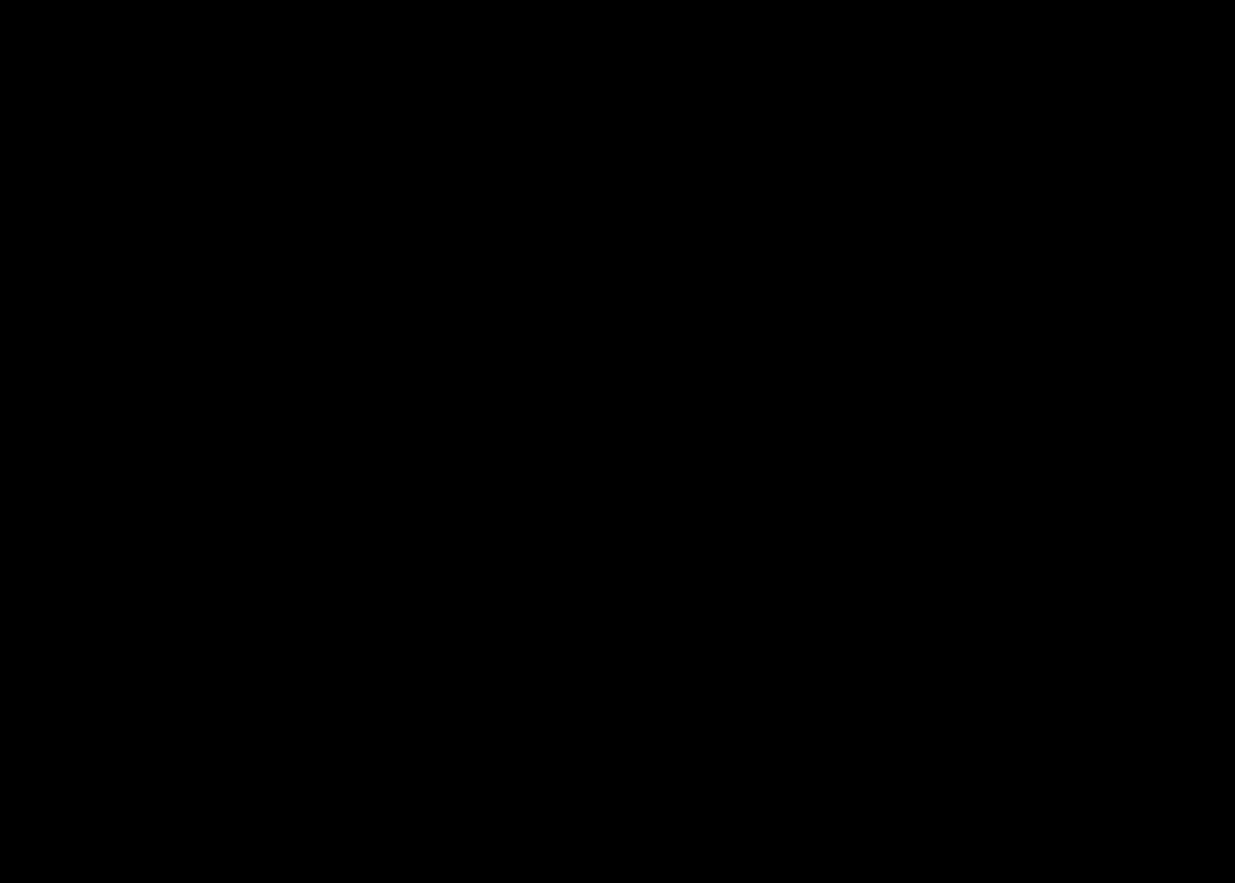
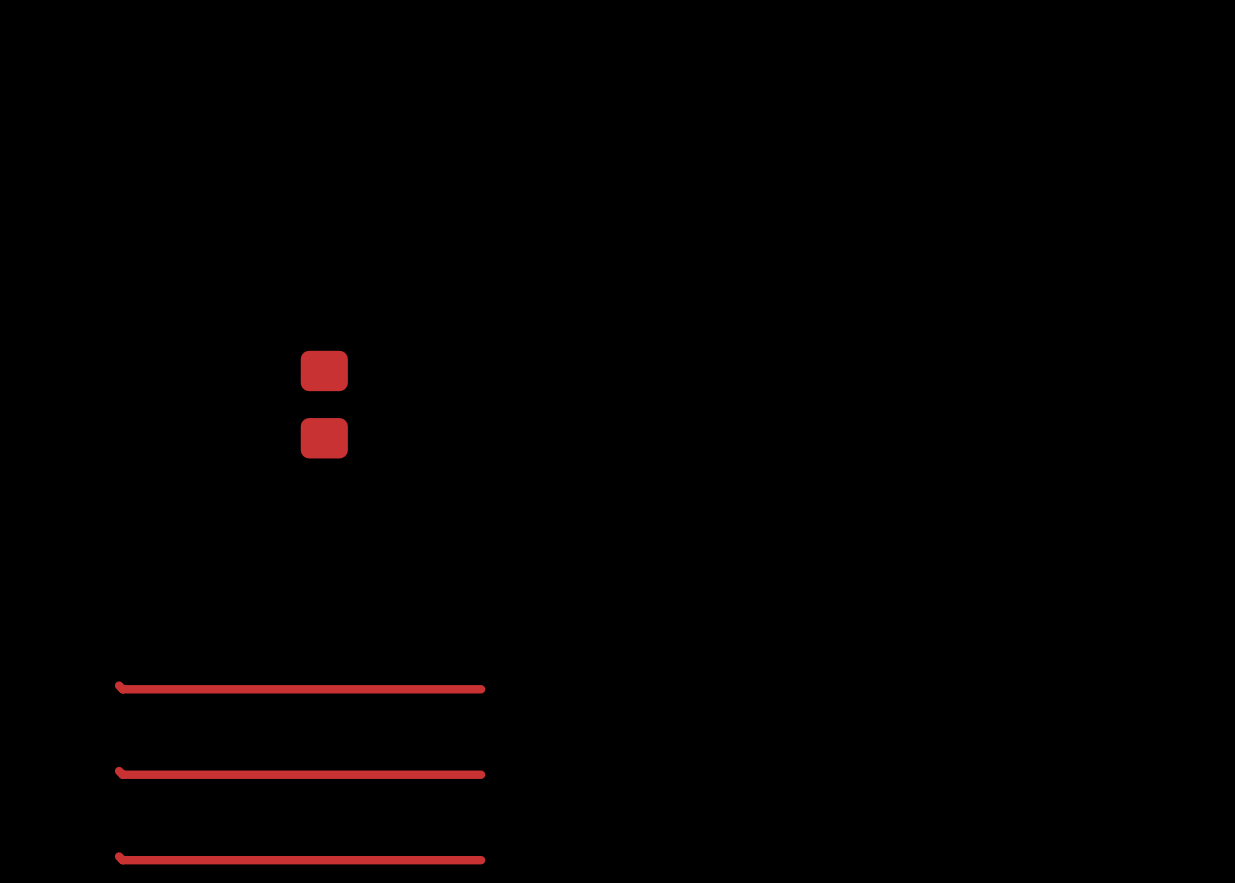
part: none -> (324, 404)
top track: none -> (119, 685) (122, 689) (481, 689)
top track: none -> (119, 771) (122, 774) (481, 774)
top track: none -> (119, 856) (122, 860) (481, 860)

